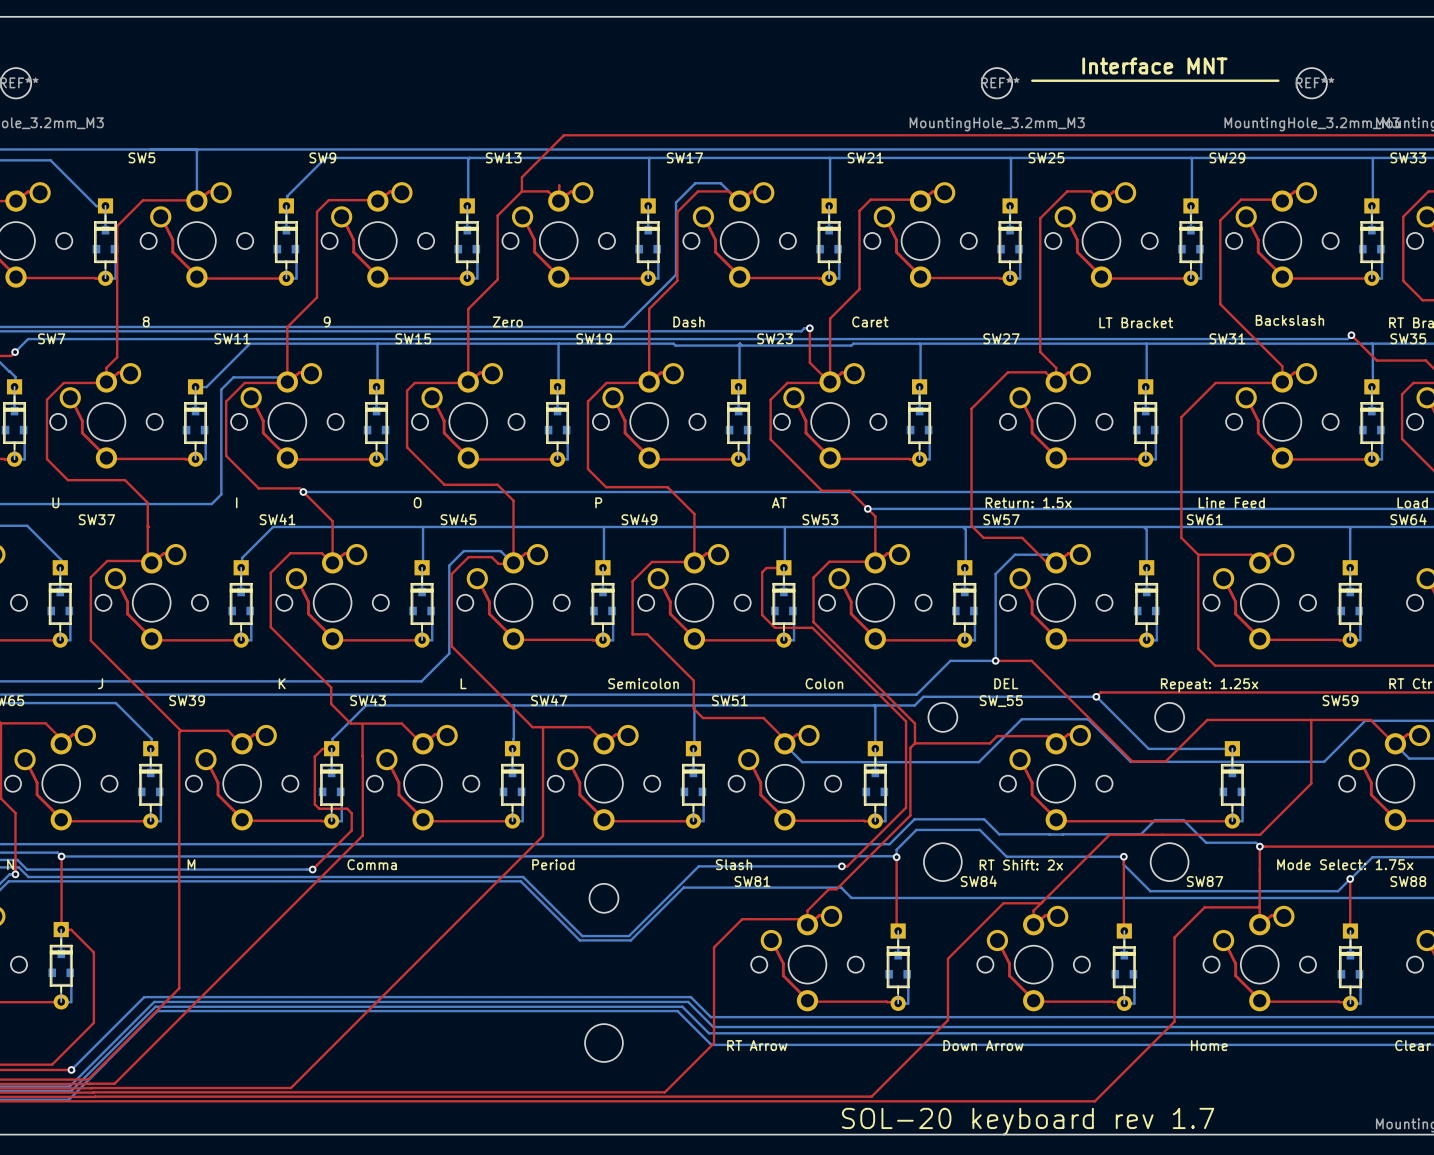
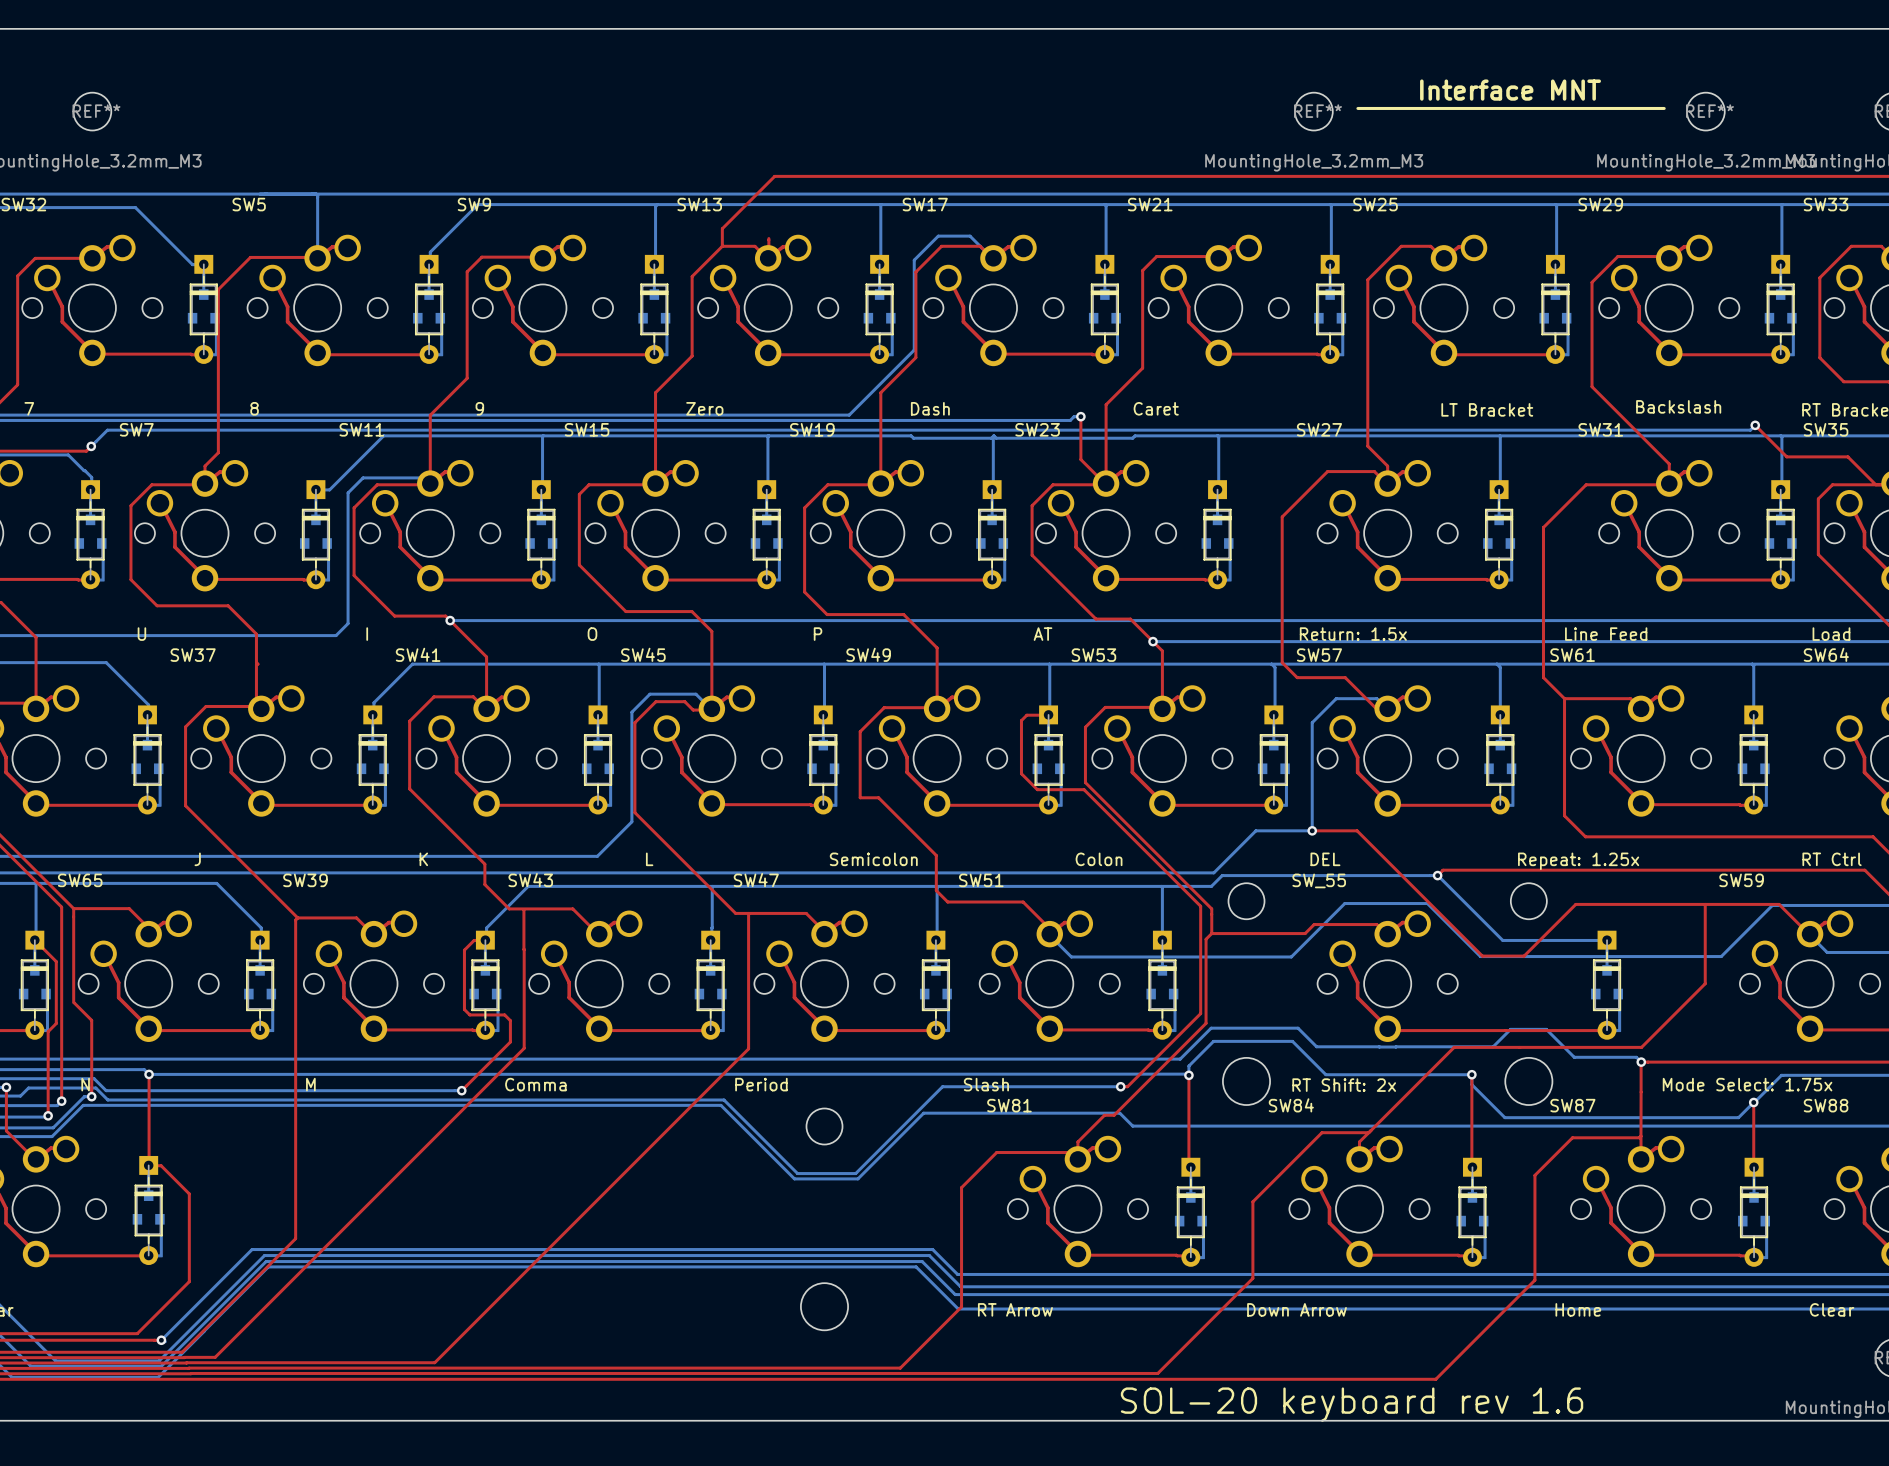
text: SOL-20 keyboard rev 1.7 (1028, 1121) -> SOL-20 keyboard rev 1.6 (1352, 1404)

